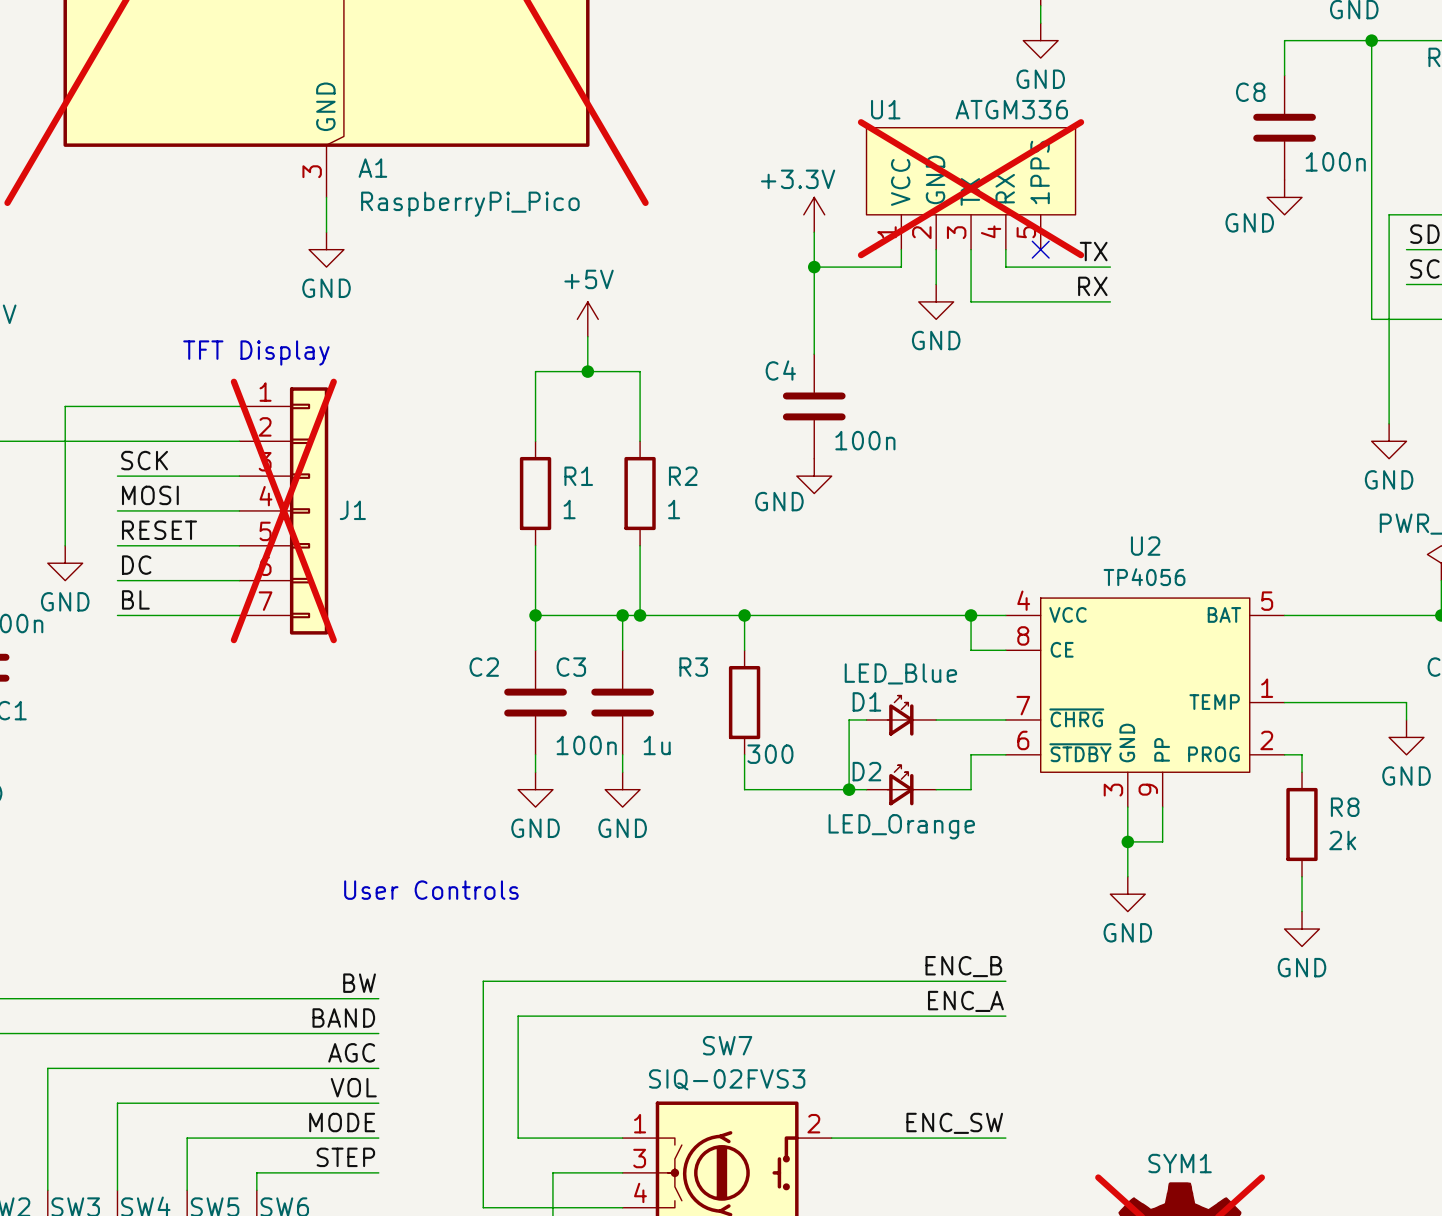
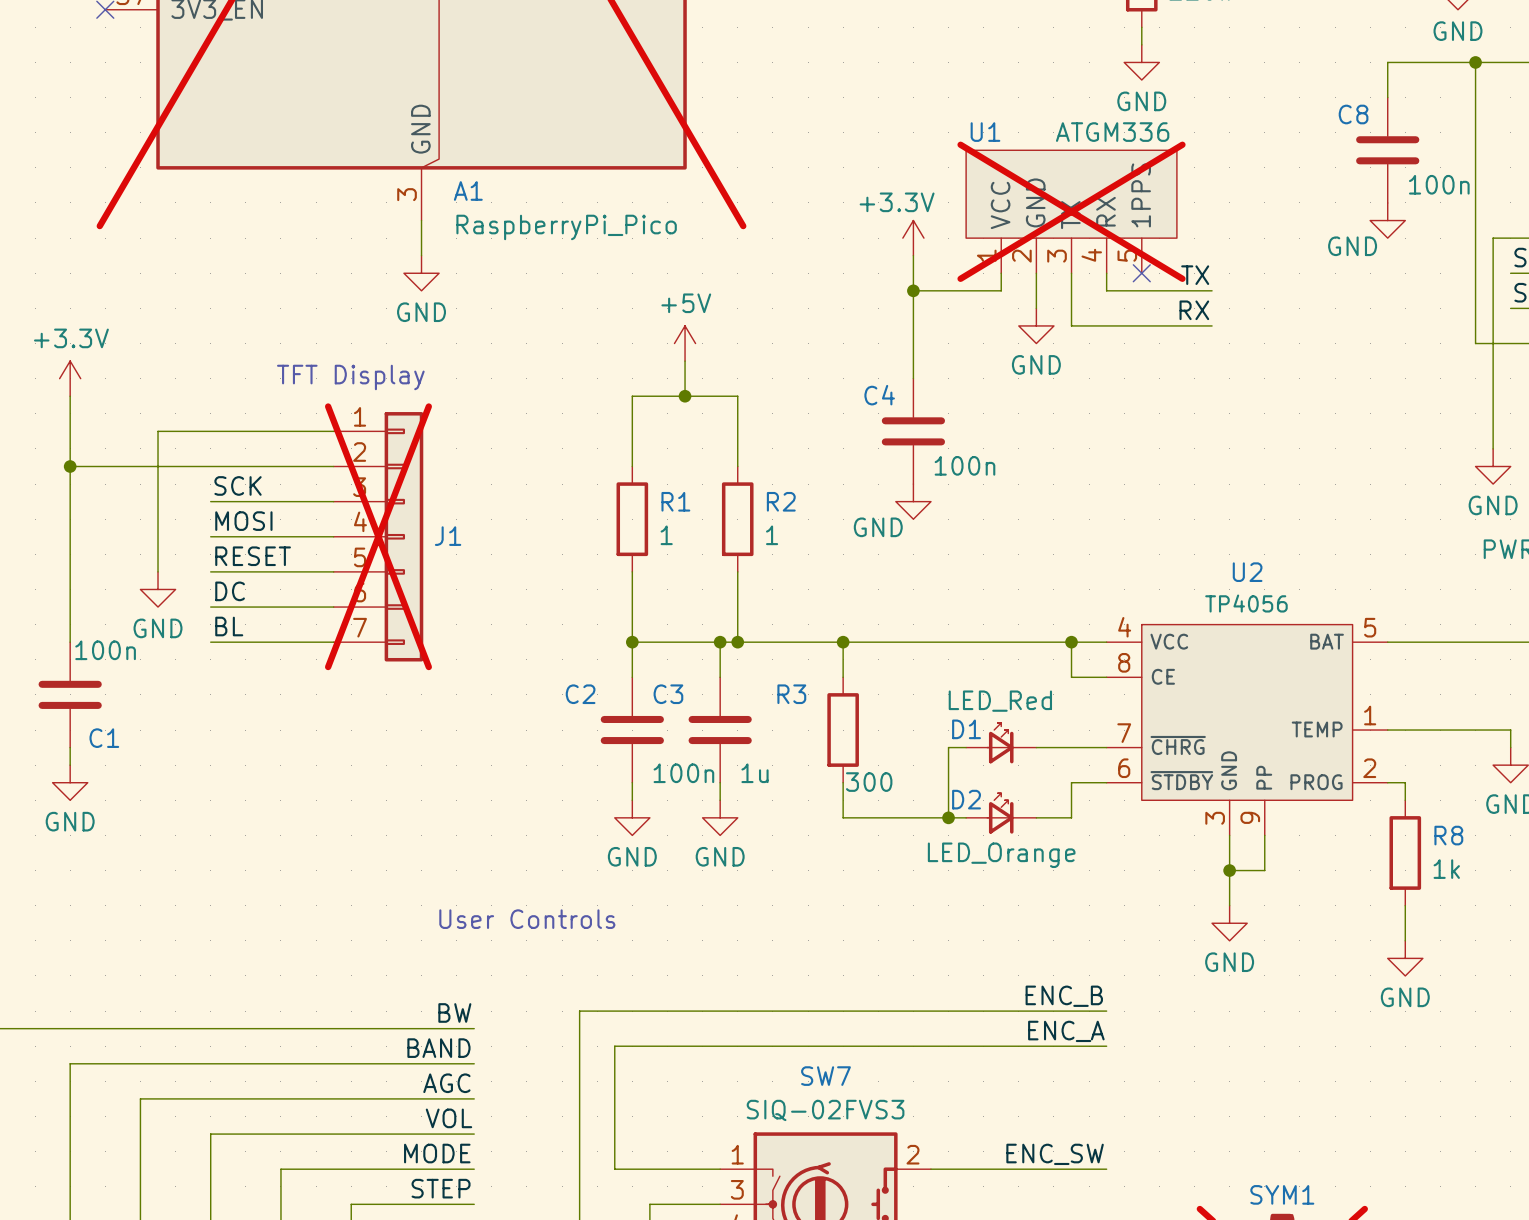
D1 value: LED_Blue (900, 673) -> LED_Red (1000, 701)
R8 value: 2k (1342, 840) -> 1k (1446, 869)

